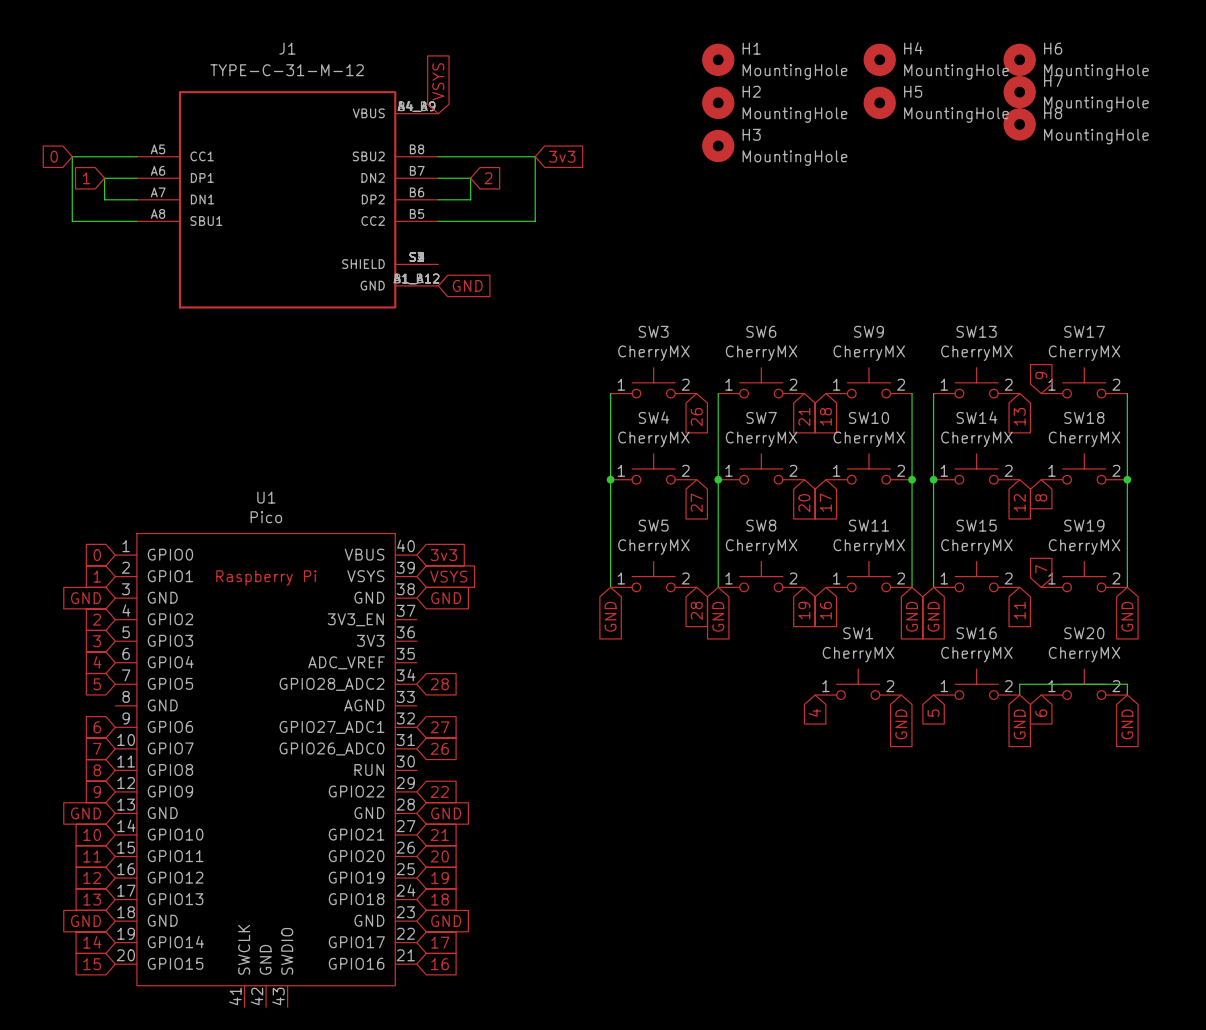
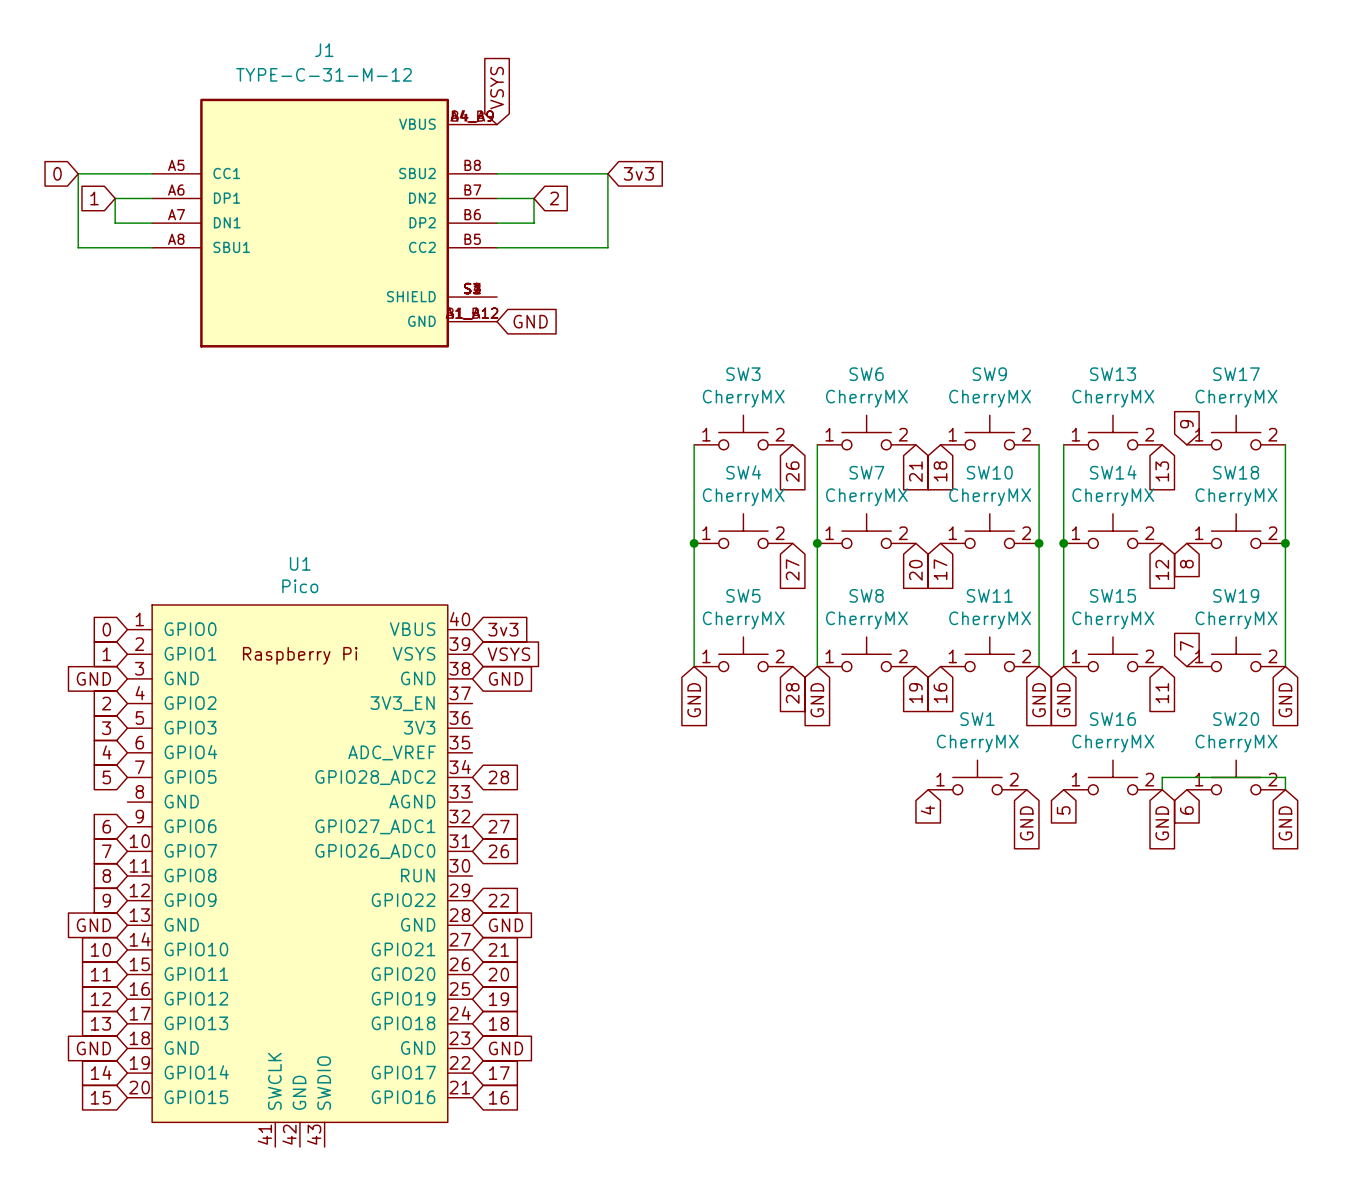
H1: MountingHole (718, 59) -> none
H4: MountingHole (879, 59) -> none
H6: MountingHole (1019, 59) -> none
H7: MountingHole (1019, 92) -> none
H2: MountingHole (718, 102) -> none
H5: MountingHole (879, 102) -> none
H8: MountingHole (1019, 124) -> none
H3: MountingHole (718, 145) -> none

